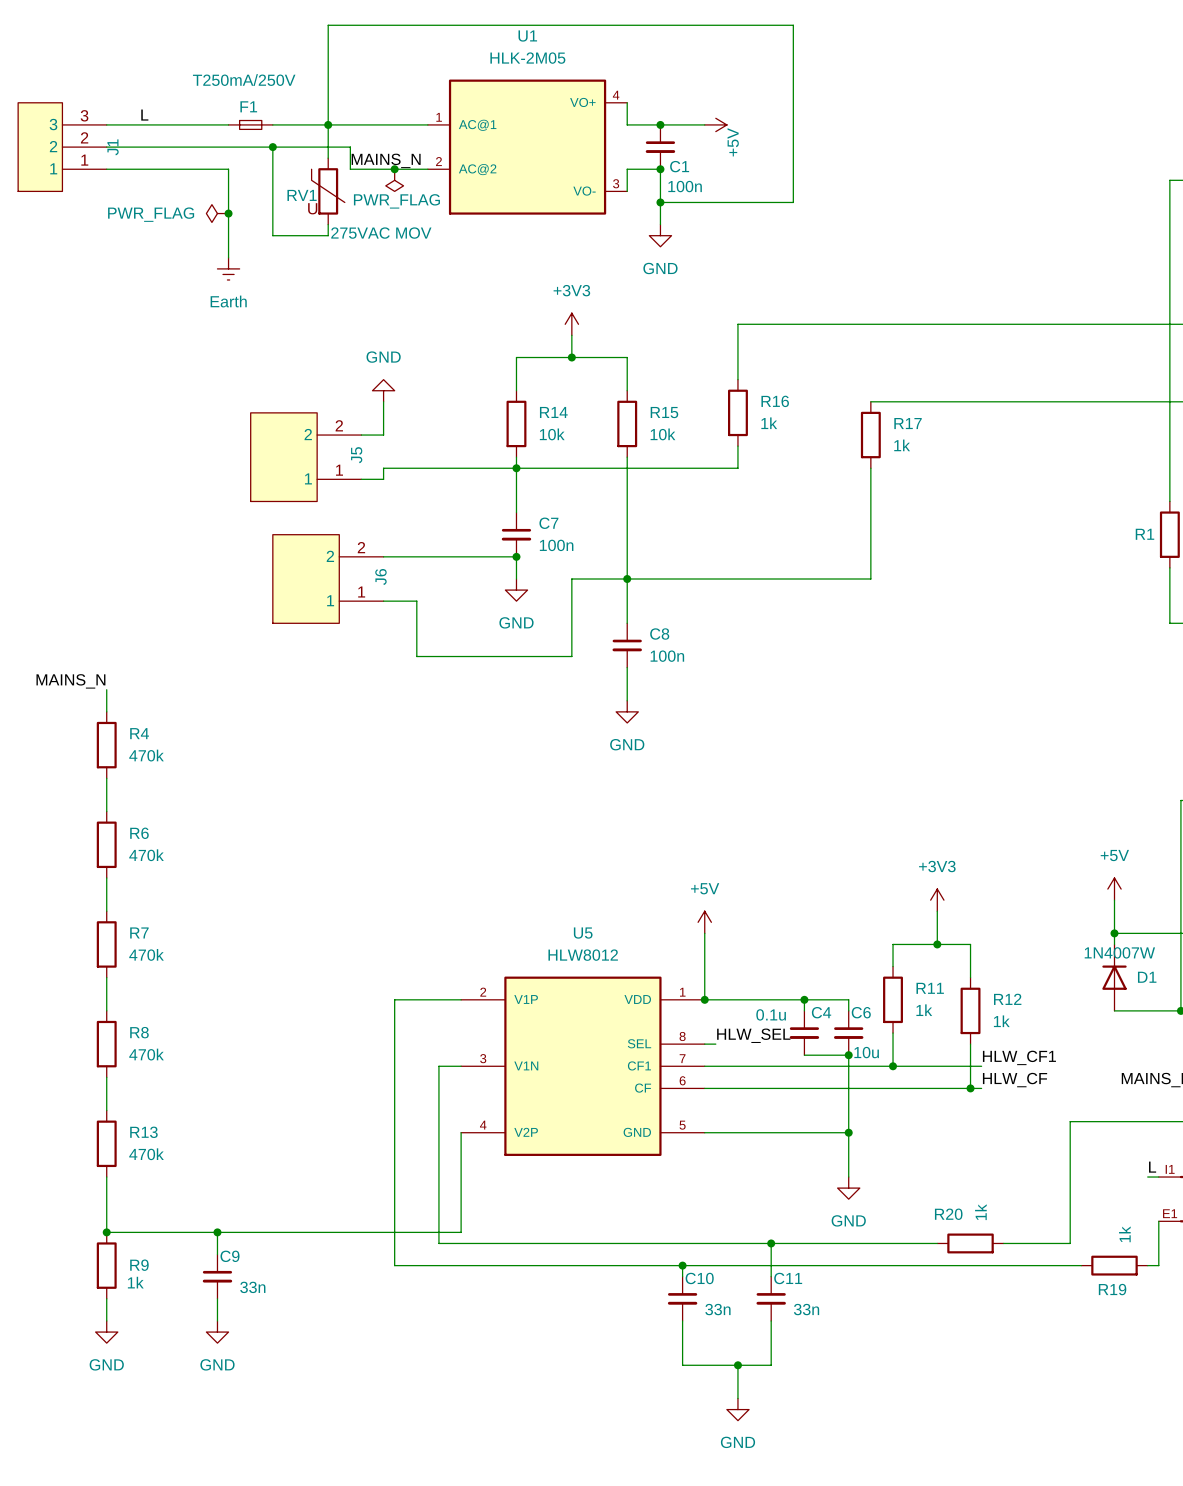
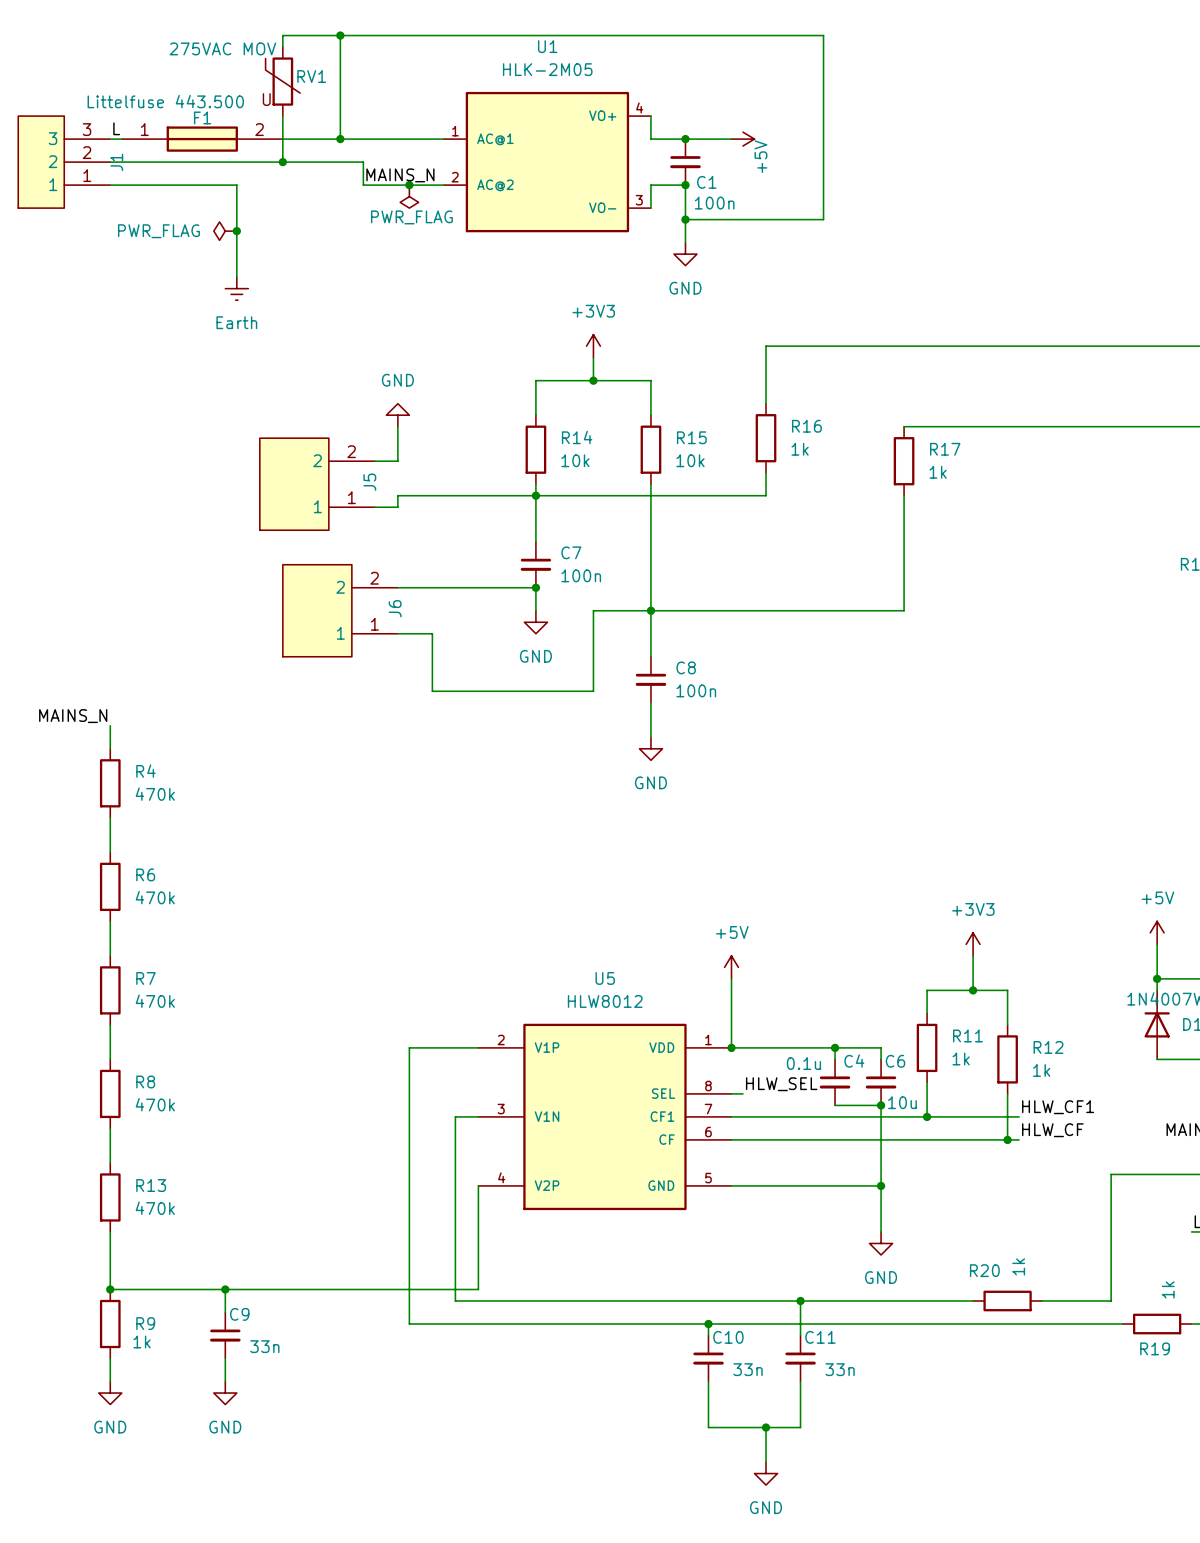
wire: none -> (340, 35) (282, 35) (282, 47)
junction: none -> (340, 35)
F1 value: T250mA/250V (244, 80) -> Littelfuse 443.500 (165, 101)
label position: L (144, 115) -> L (116, 128)
F1 symbol: [228, 120, 273, 130] -> [121, 126, 283, 152]
wire: (328, 124) (328, 158) -> none
wire: (272, 147) (272, 235) (328, 235) (328, 224) -> (282, 162) (282, 116)
RV1 position: (328, 191) -> (282, 81)
RV1 name position: RV1 (302, 195) -> RV1 (311, 76)
RV1 value position: 275VAC MOV (381, 233) -> 275VAC MOV (222, 48)

